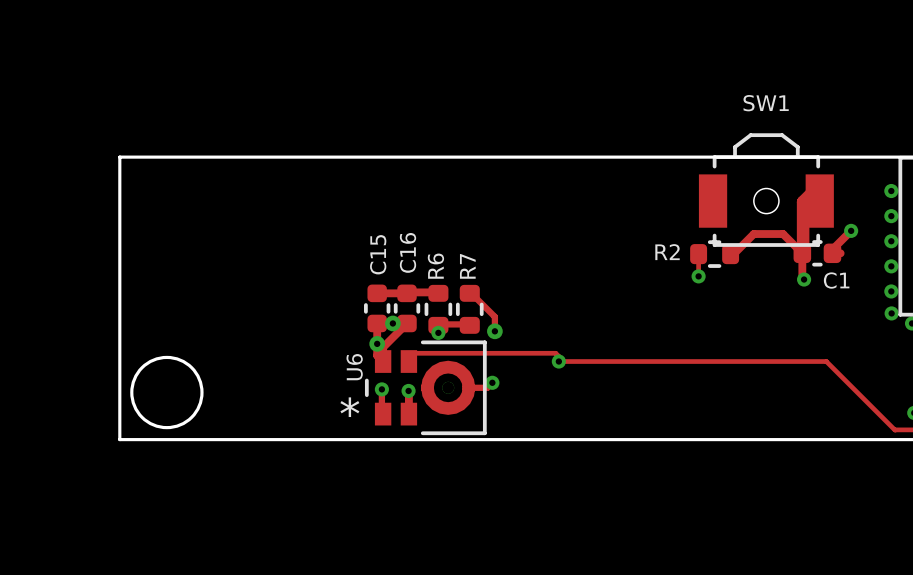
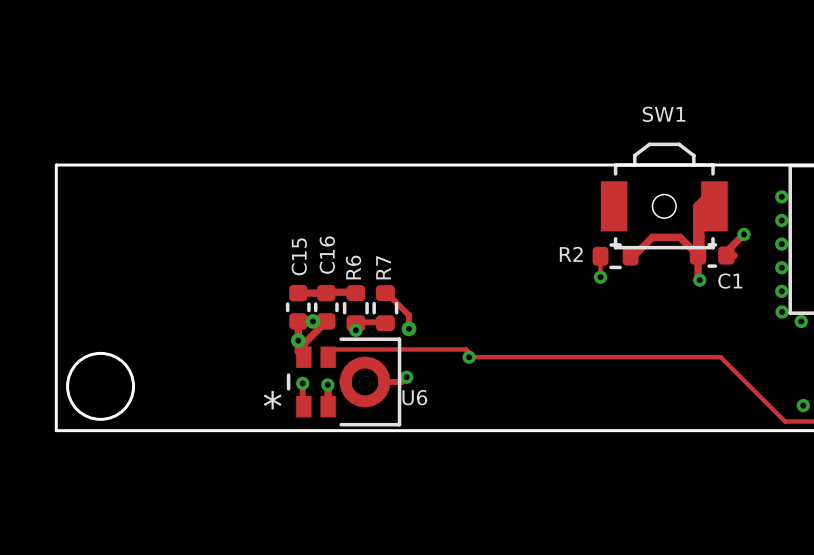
U6 name rotation: 0° (354, 367) -> 90° clockwise (414, 397)
U6 name position: U6 (354, 367) -> U6 (414, 397)

